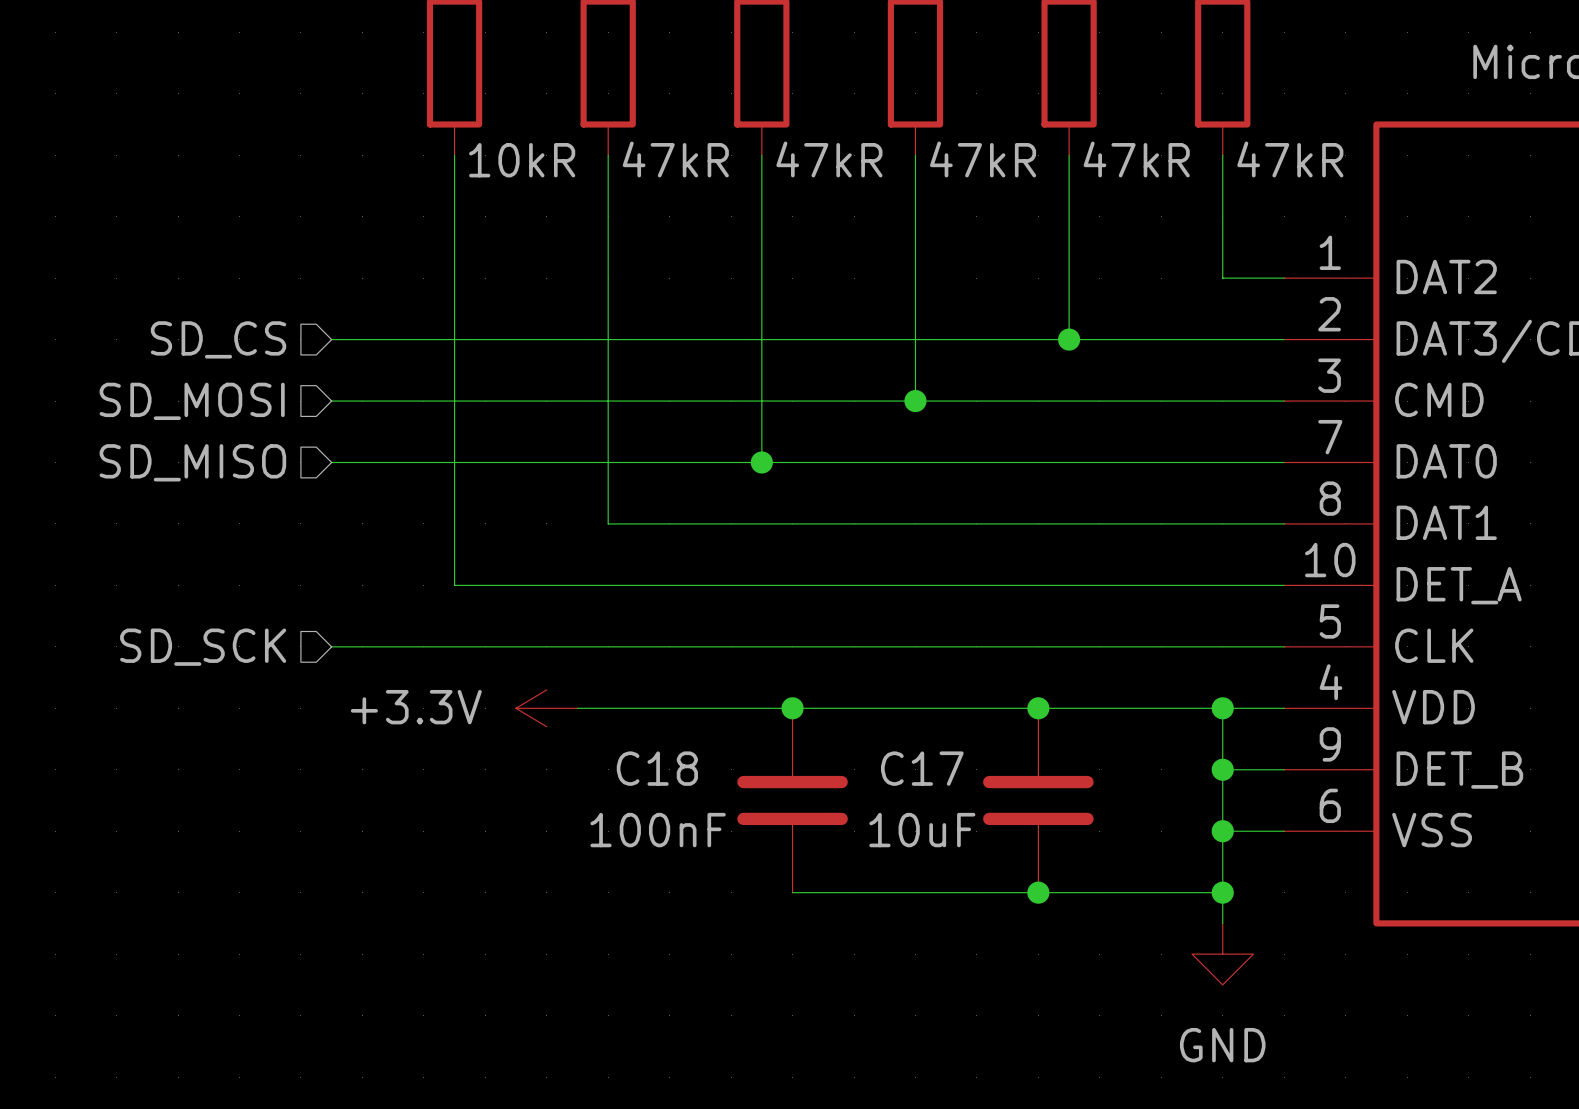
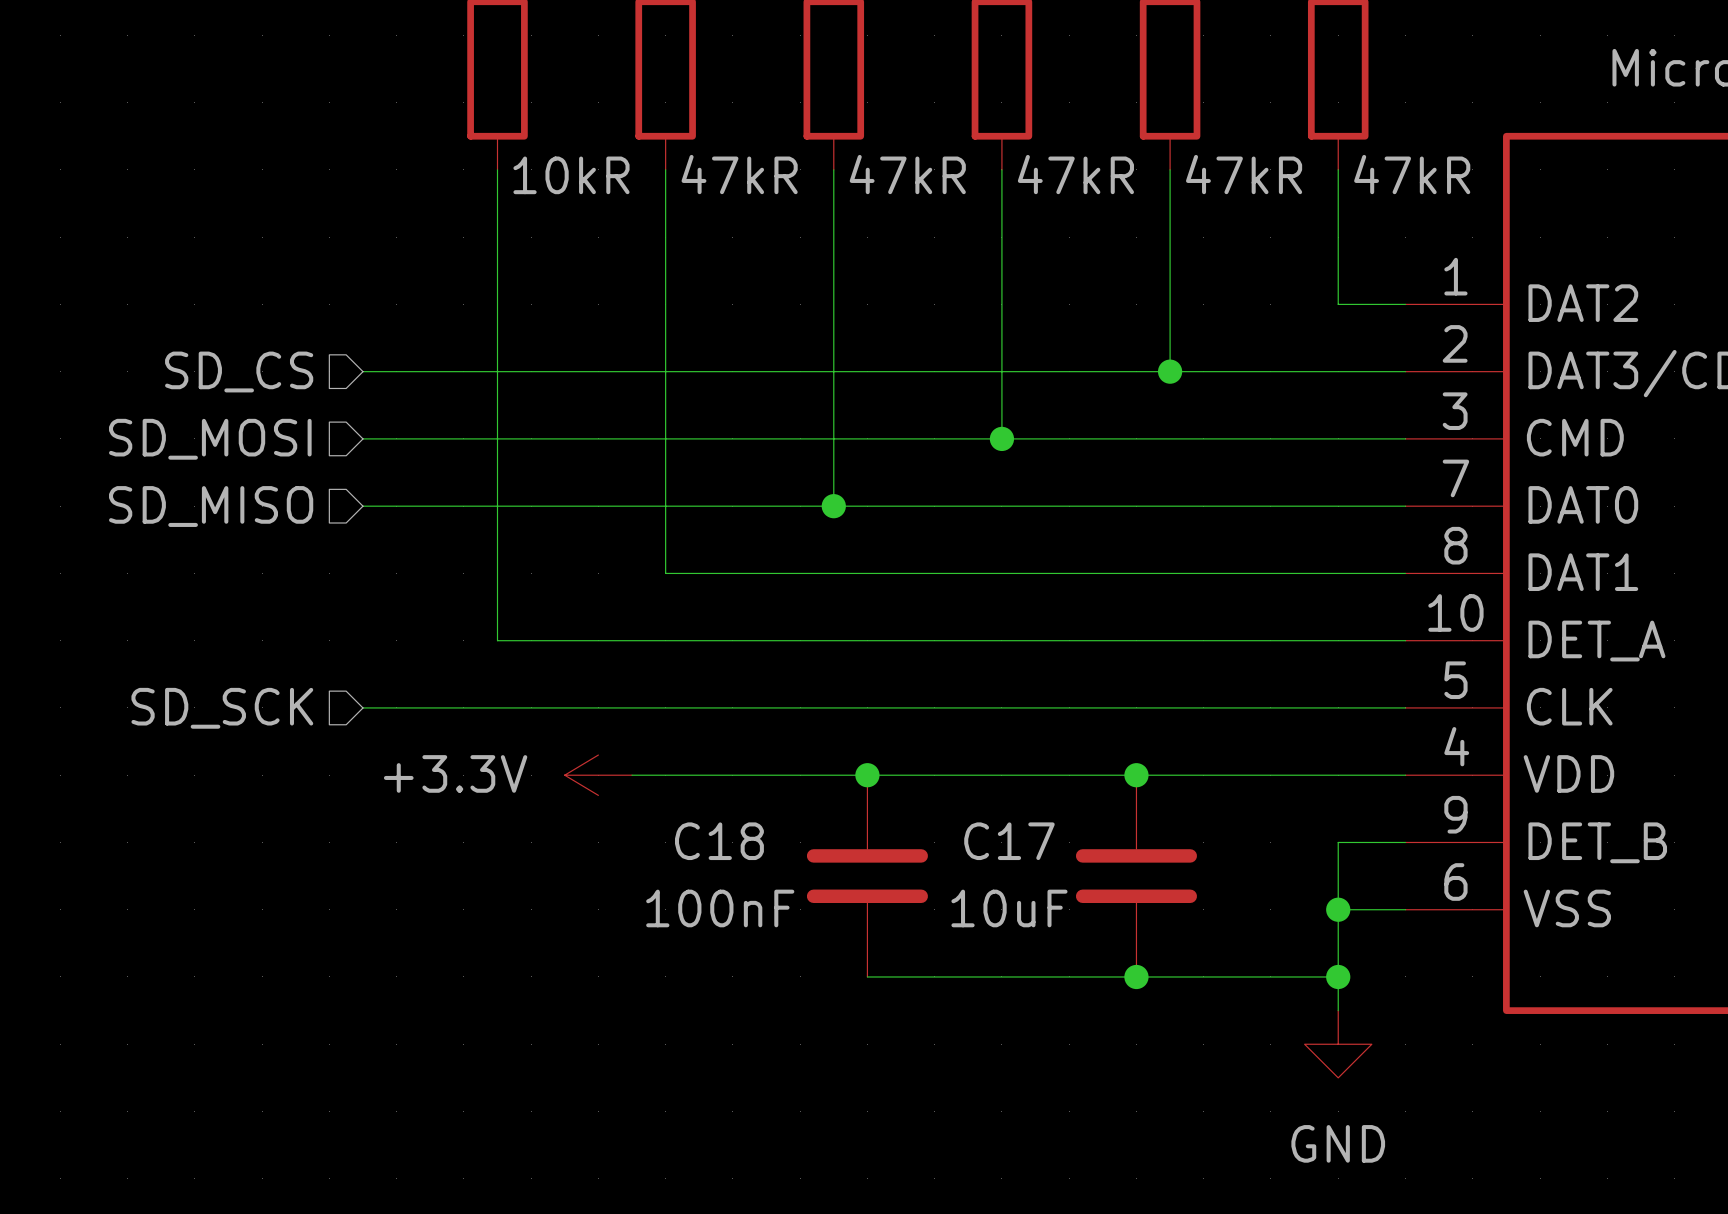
wire: (1222, 708) (1222, 769) -> none
junction: (1222, 708) -> none
junction: (1222, 769) -> none

